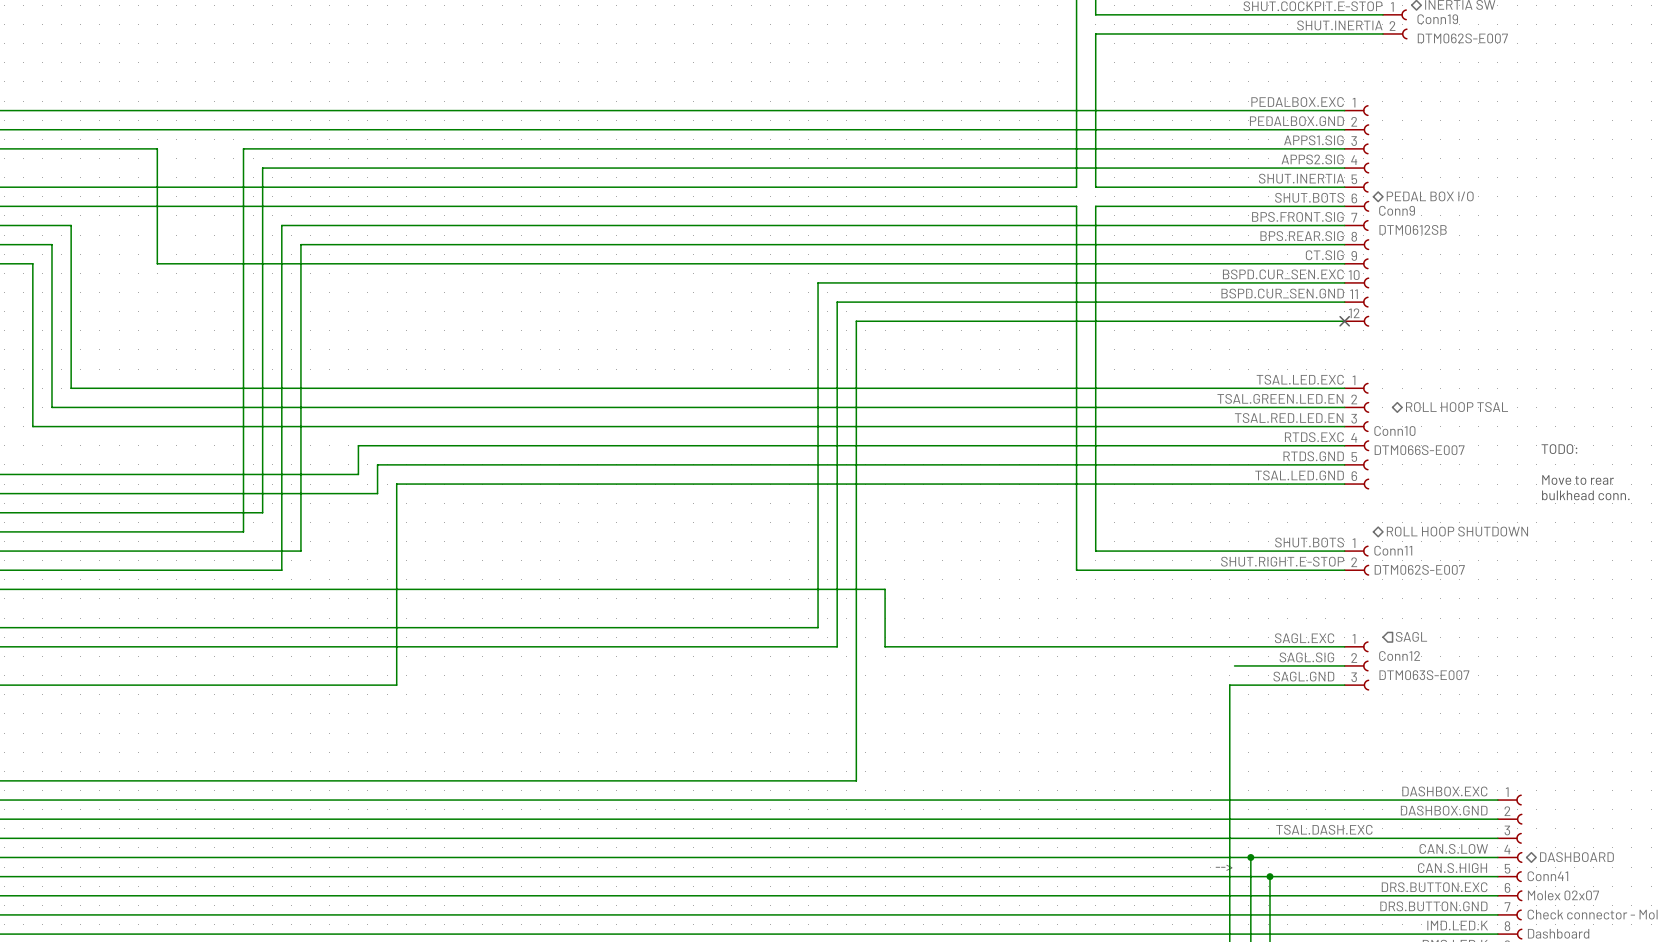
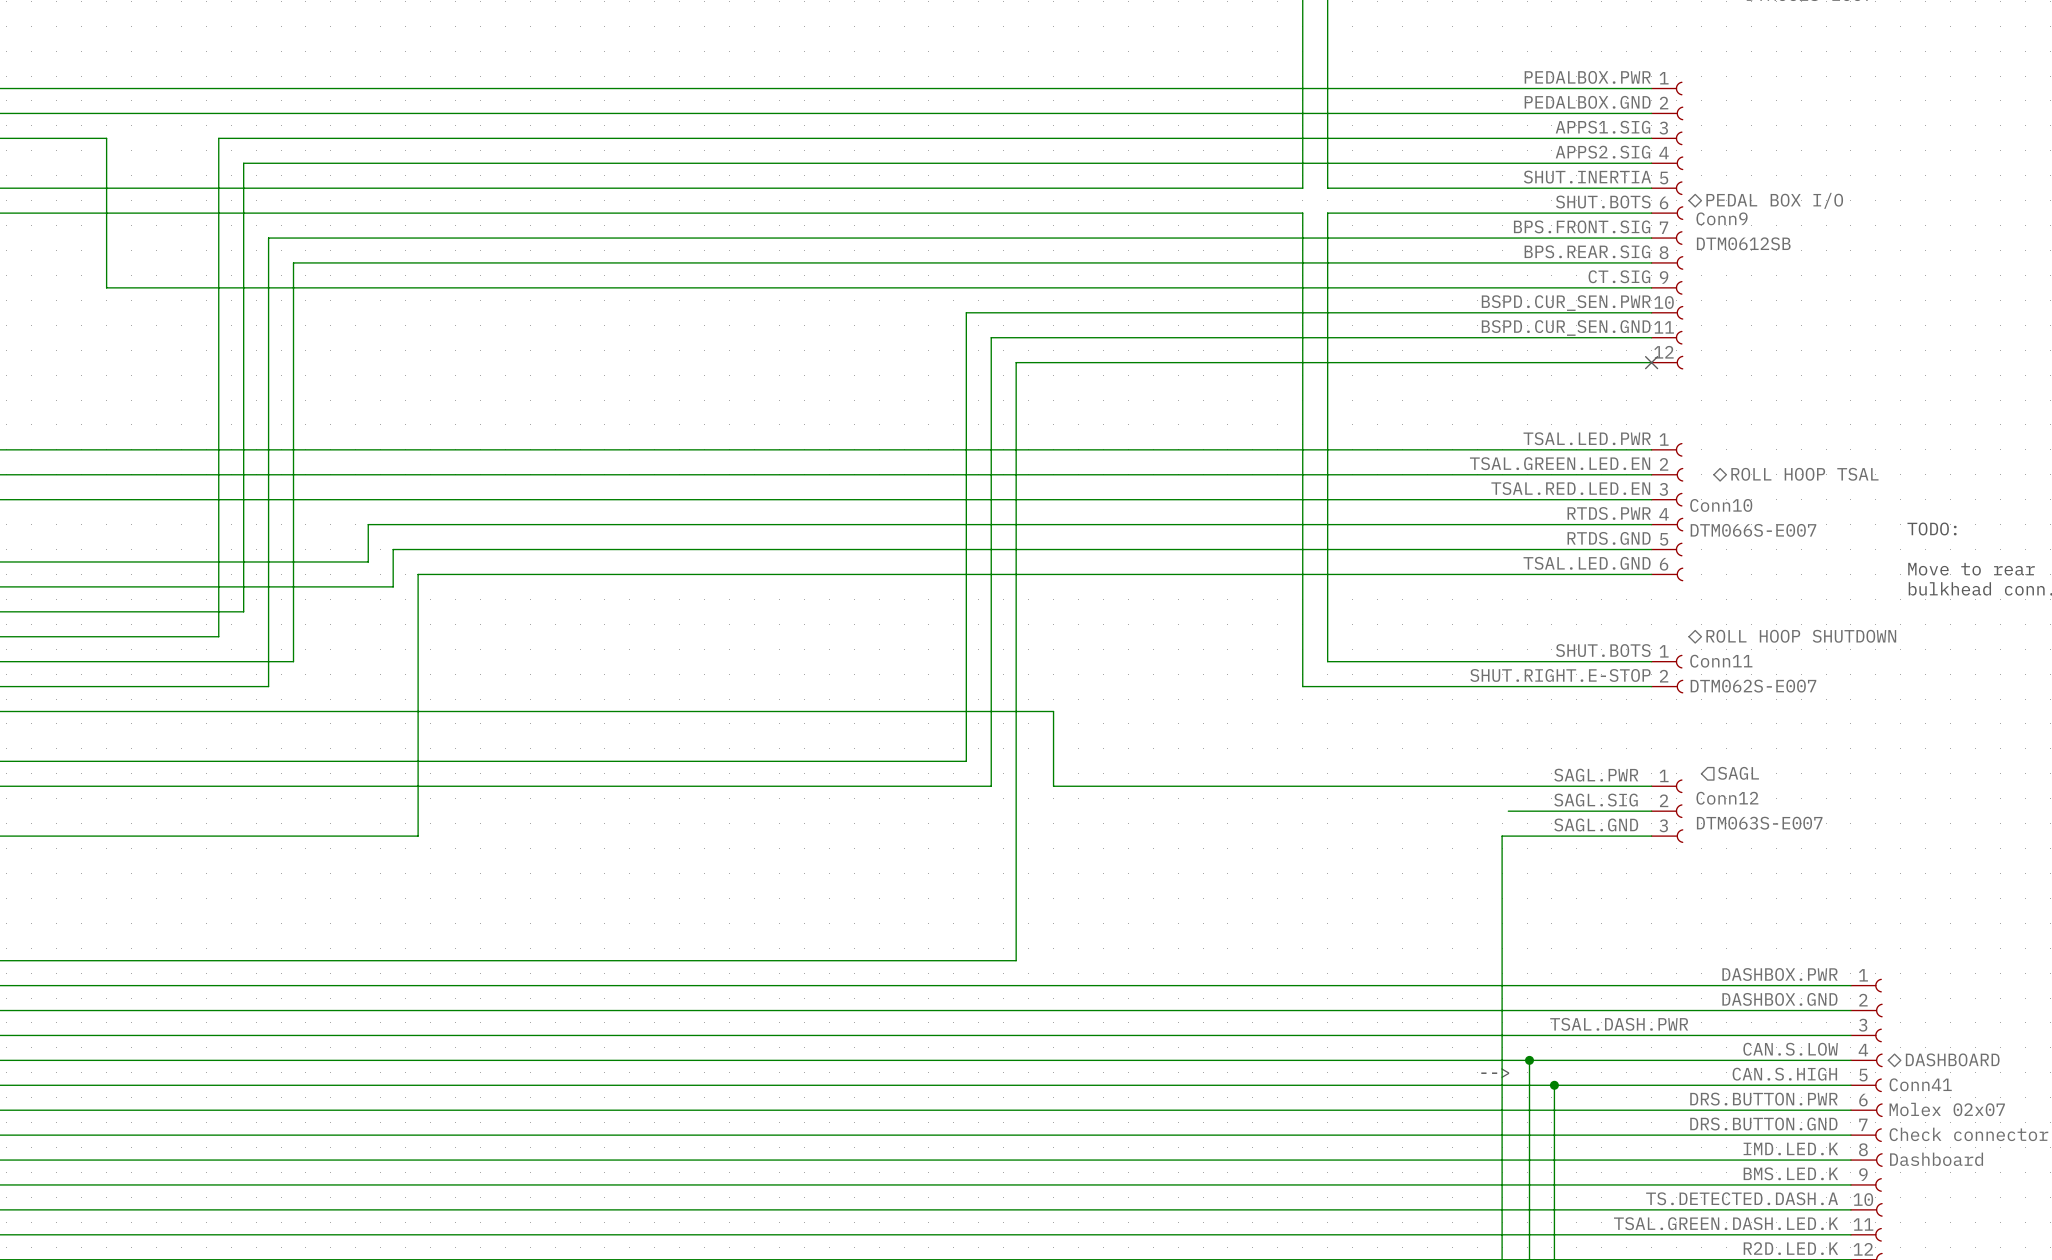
label: PEDALBOX.EXC (1297, 102) -> PEDALBOX.PWR (1587, 77)
label: BSPD.CUR_SEN.EXC (1283, 274) -> BSPD.CUR_SEN.PWR (1566, 303)
label: TSAL.LED.EXC (1300, 379) -> TSAL.LED.PWR (1587, 438)
label: RTDS.EXC (1314, 437) -> RTDS.PWR (1609, 513)
label: SAGL.EXC (1304, 638) -> SAGL.PWR (1596, 775)
label: DASHBOX.EXC (1444, 791) -> DASHBOX.PWR (1779, 974)
label: TSAL.DASH.EXC (1324, 829) -> TSAL.DASH.PWR (1619, 1024)
label: DRS.BUTTON.EXC (1434, 887) -> DRS.BUTTON.PWR (1763, 1099)

